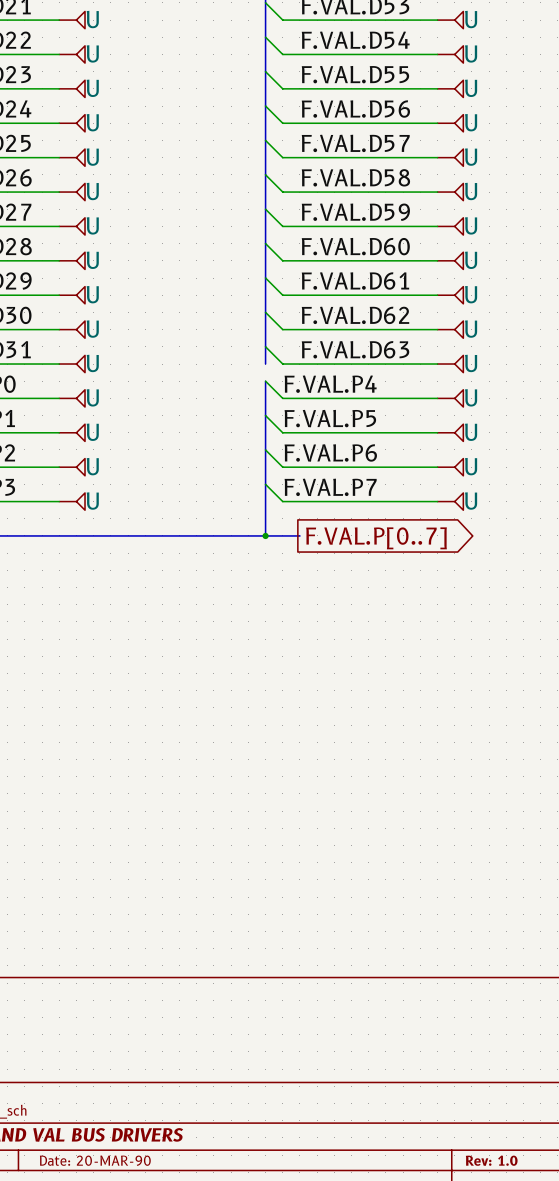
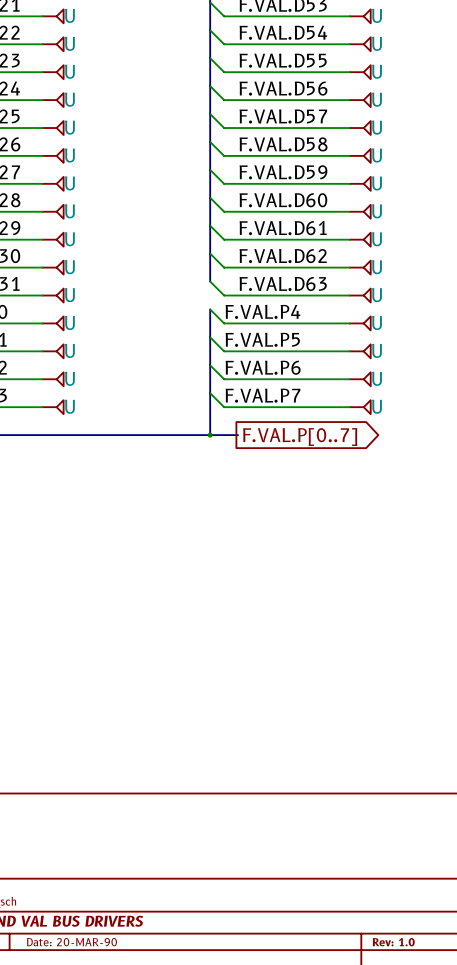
bus: (265, 346) (265, 364) -> none

